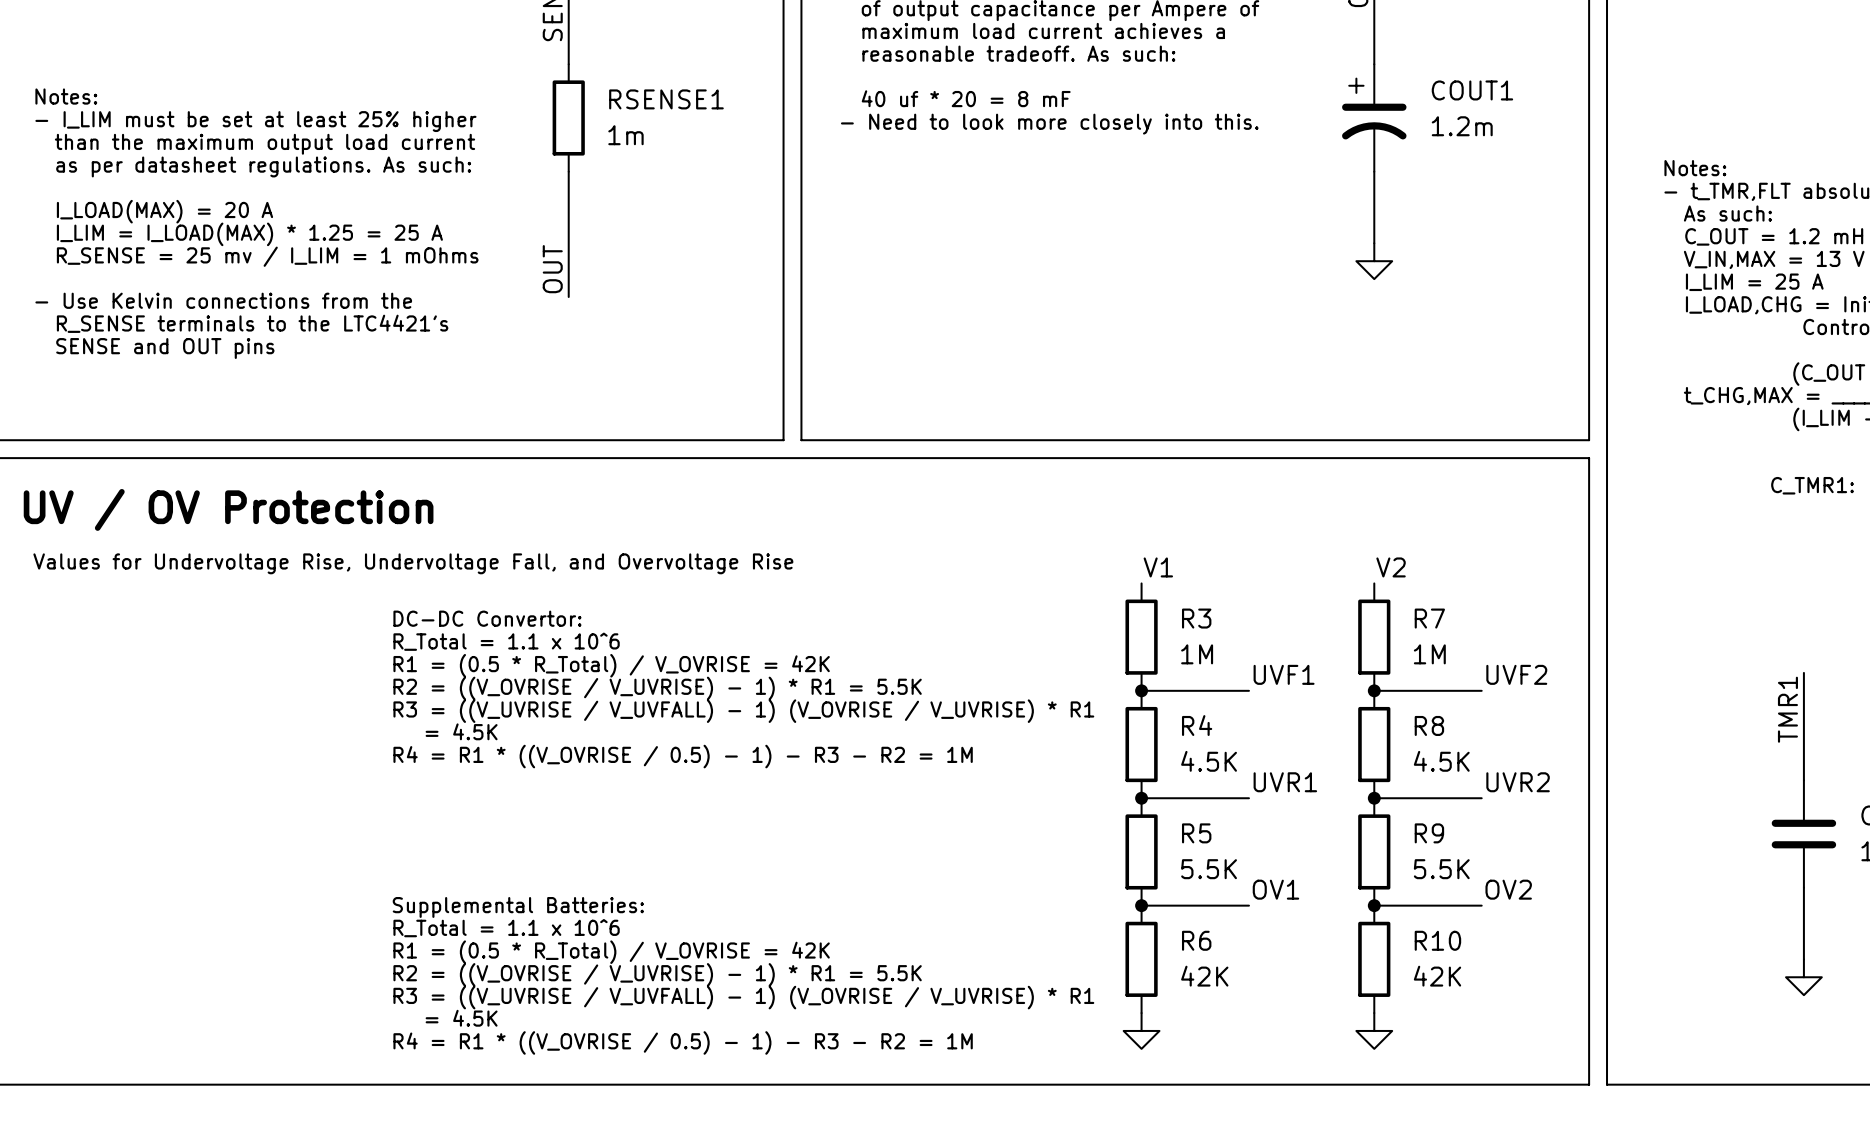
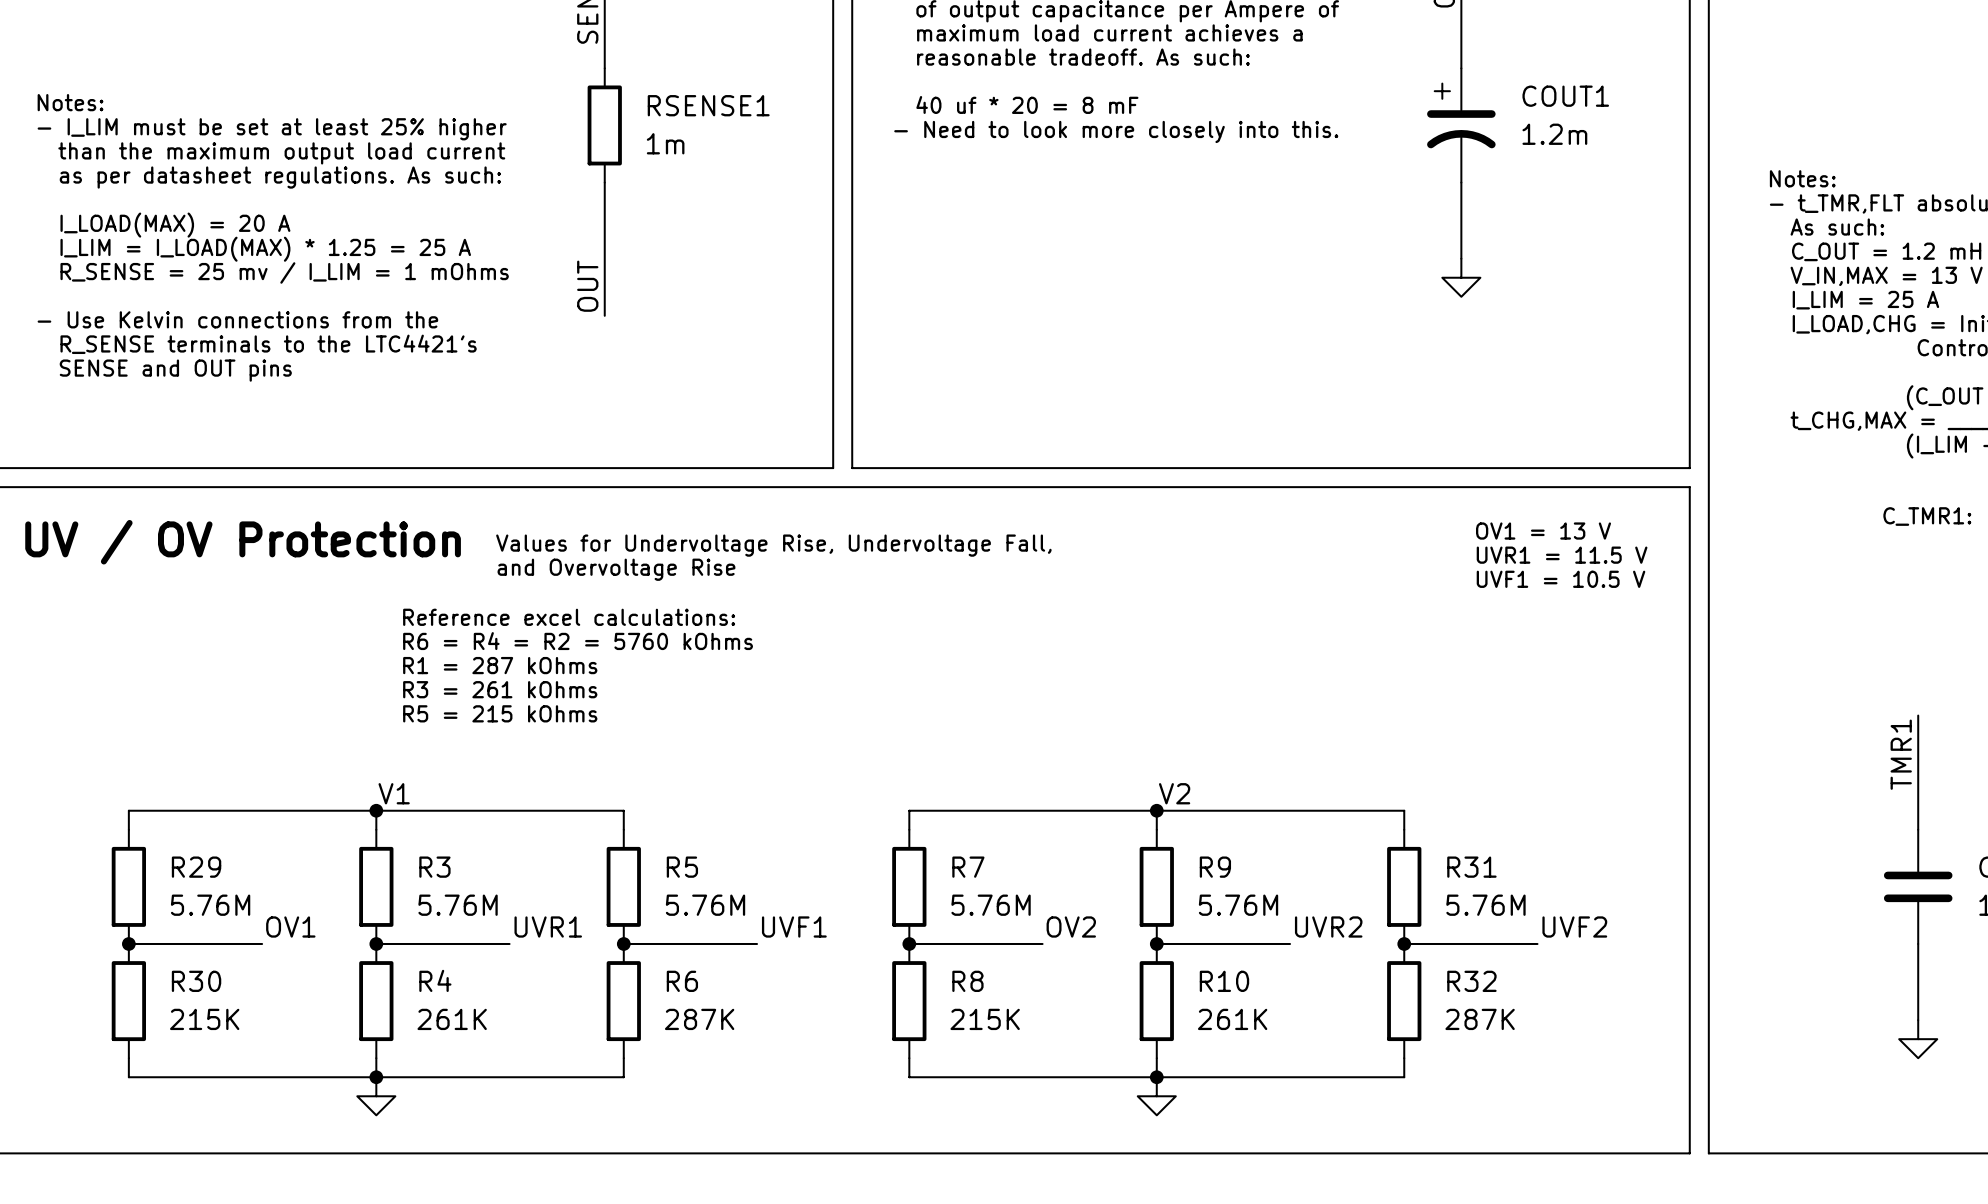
text: none -> OV1 = 13 V (1543, 531)
text: none -> Values for Undervoltage Rise, Undervoltage Fall, (773, 545)
text: none -> UVR1 = 11.5 V (1562, 555)
text: none -> and Overvoltage Rise (616, 569)
text: none -> UVF1 = 10.5 V (1561, 579)
text: Values for Undervoltage Rise, Undervoltage Fall, and Overvoltage Rise (413, 563) -> none
label: V1 (1158, 567) -> none
label position: V2 (1391, 567) -> V2 (1174, 793)
text: none -> Reference excel calculations: (569, 617)
text: none -> R6 = R4 = R2 = 5760 kOhms (578, 641)
text: DC-DC Convertor: (487, 618) -> none
text: none -> R1 = 287 kOhms (500, 665)
R3 position: (1141, 637) -> (376, 886)
R7 position: (1374, 637) -> (909, 886)
text: R_Total = 1.1 x 10^6 (506, 641) -> none
text: none -> R3 = 261 kOhms (500, 689)
R3 value: 1M (1197, 654) -> 5.76M (458, 905)
R7 value: 1M (1429, 654) -> 5.76M (991, 905)
text: R1 = (0.5 * R_Total) / V_OVRISE = 42K (611, 665) -> none
text: none -> R5 = 215 kOhms (500, 713)
label: UVF1 (1284, 674) -> none
label position: UVF2 (1516, 674) -> UVF2 (1574, 927)
text: R2 = ((V_OVRISE / V_UVRISE) - 1) * R1 = 5.5K (657, 688) -> none
wire: (1141, 690) (1248, 690) -> none
junction: (1141, 690) -> none
wire: (1374, 690) (1481, 690) -> none
junction: (1374, 690) -> none
text: R3 = ((V_UVRISE / V_UVFALL) - 1) (V_OVRISE / V_UVRISE) * R1 (743, 711) -> none
text: = 4.5K (461, 731) -> none
R4 position: (1141, 744) -> (376, 1001)
R8 position: (1374, 744) -> (909, 1001)
label: none -> V1 (394, 793)
text: R4 = R1 * ((V_OVRISE / 0.5) - 1) - R3 - R2 = 1M (683, 756) -> none
R4 value: 4.5K (1209, 761) -> 261K (452, 1019)
R8 value: 4.5K (1441, 761) -> 215K (985, 1019)
wire: none -> (376, 810) (376, 829)
junction: none -> (376, 810)
wire: none -> (1156, 810) (1156, 829)
junction: none -> (1156, 810)
wire: none -> (128, 829) (128, 810) (623, 810) (623, 829)
wire: none -> (909, 829) (909, 810) (1404, 810) (1404, 829)
label: UVR1 (1285, 782) -> none
label position: UVR2 (1518, 782) -> UVR2 (1328, 927)
wire: (1141, 798) (1248, 798) -> none
junction: (1141, 798) -> none
wire: (1374, 798) (1481, 798) -> none
junction: (1374, 798) -> none
R29: none -> 5.76M (128, 886)
R31: none -> 5.76M (1404, 886)
R5 position: (1141, 851) -> (623, 886)
R9 position: (1374, 851) -> (1156, 886)
R5 value: 5.5K (1209, 869) -> 5.76M (705, 905)
R9 value: 5.5K (1441, 869) -> 5.76M (1238, 905)
label: none -> OV1 (290, 927)
label: none -> UVR1 (548, 927)
label: none -> UVF1 (794, 927)
label: none -> OV2 (1071, 927)
wire: none -> (128, 943) (262, 943)
junction: none -> (128, 943)
wire: none -> (376, 943) (509, 943)
junction: none -> (376, 943)
wire: none -> (623, 943) (757, 943)
junction: none -> (623, 943)
wire: none -> (909, 943) (1042, 943)
junction: none -> (909, 943)
wire: none -> (1156, 943) (1290, 943)
junction: none -> (1156, 943)
wire: none -> (1404, 943) (1537, 943)
junction: none -> (1404, 943)
label: OV1 (1275, 889) -> none
label: OV2 (1508, 889) -> none
wire: (1141, 905) (1248, 905) -> none
junction: (1141, 905) -> none
wire: (1374, 905) (1481, 905) -> none
junction: (1374, 905) -> none
text: Supplemental Batteries: (518, 907) -> none
text: R_Total = 1.1 x 10^6 (506, 928) -> none
R30: none -> 215K (128, 1001)
R32: none -> 287K (1404, 1001)
text: R1 = (0.5 * R_Total) / V_OVRISE = 42K (611, 952) -> none
R6 position: (1141, 959) -> (623, 1001)
R10 position: (1374, 959) -> (1156, 1001)
text: R2 = ((V_OVRISE / V_UVRISE) - 1) * R1 = 5.5K (657, 974) -> none
R6 value: 42K (1204, 976) -> 287K (699, 1019)
R10 value: 42K (1437, 976) -> 261K (1232, 1019)
wire: none -> (128, 1058) (128, 1077) (623, 1077) (623, 1058)
wire: none -> (376, 1058) (376, 1077)
wire: none -> (909, 1058) (909, 1077) (1404, 1077) (1404, 1058)
wire: none -> (1156, 1058) (1156, 1077)
text: R3 = ((V_UVRISE / V_UVFALL) - 1) (V_OVRISE / V_UVRISE) * R1 (743, 997) -> none
junction: none -> (376, 1077)
junction: none -> (1156, 1077)
text: = 4.5K (461, 1018) -> none
power symbol: none -> (376, 1096)
power symbol position: (1141, 1030) -> (1156, 1096)
power symbol: (1374, 1030) -> none
text: R4 = R1 * ((V_OVRISE / 0.5) - 1) - R3 - R2 = 1M (683, 1042) -> none

